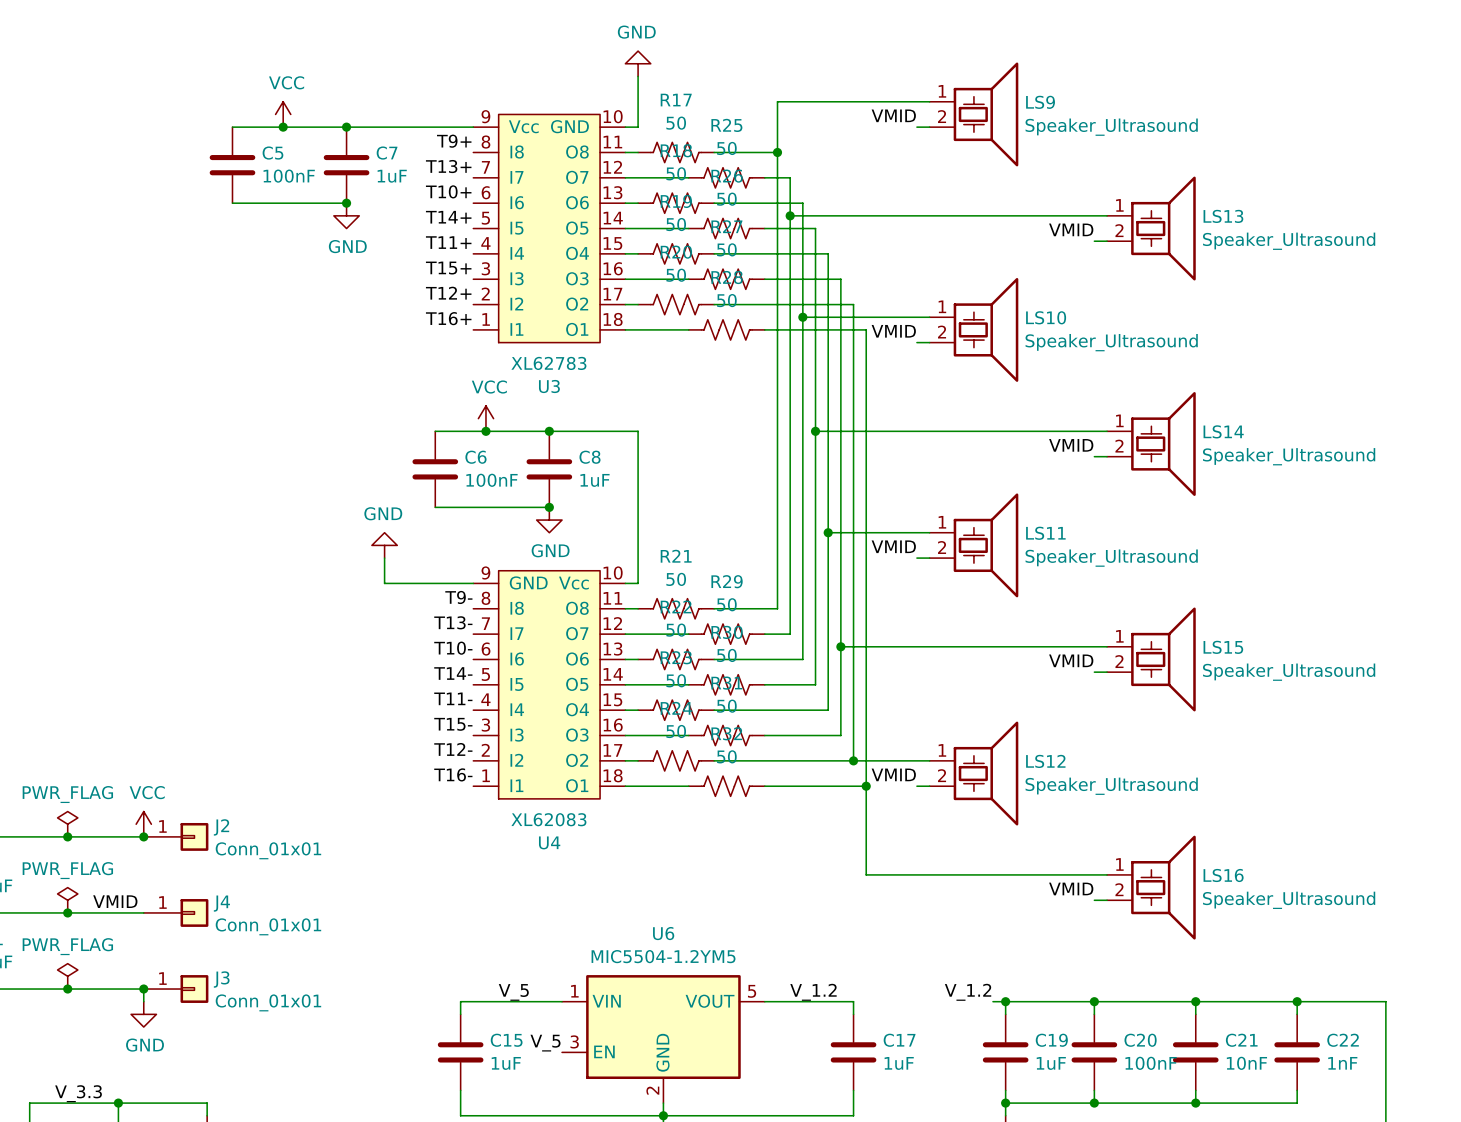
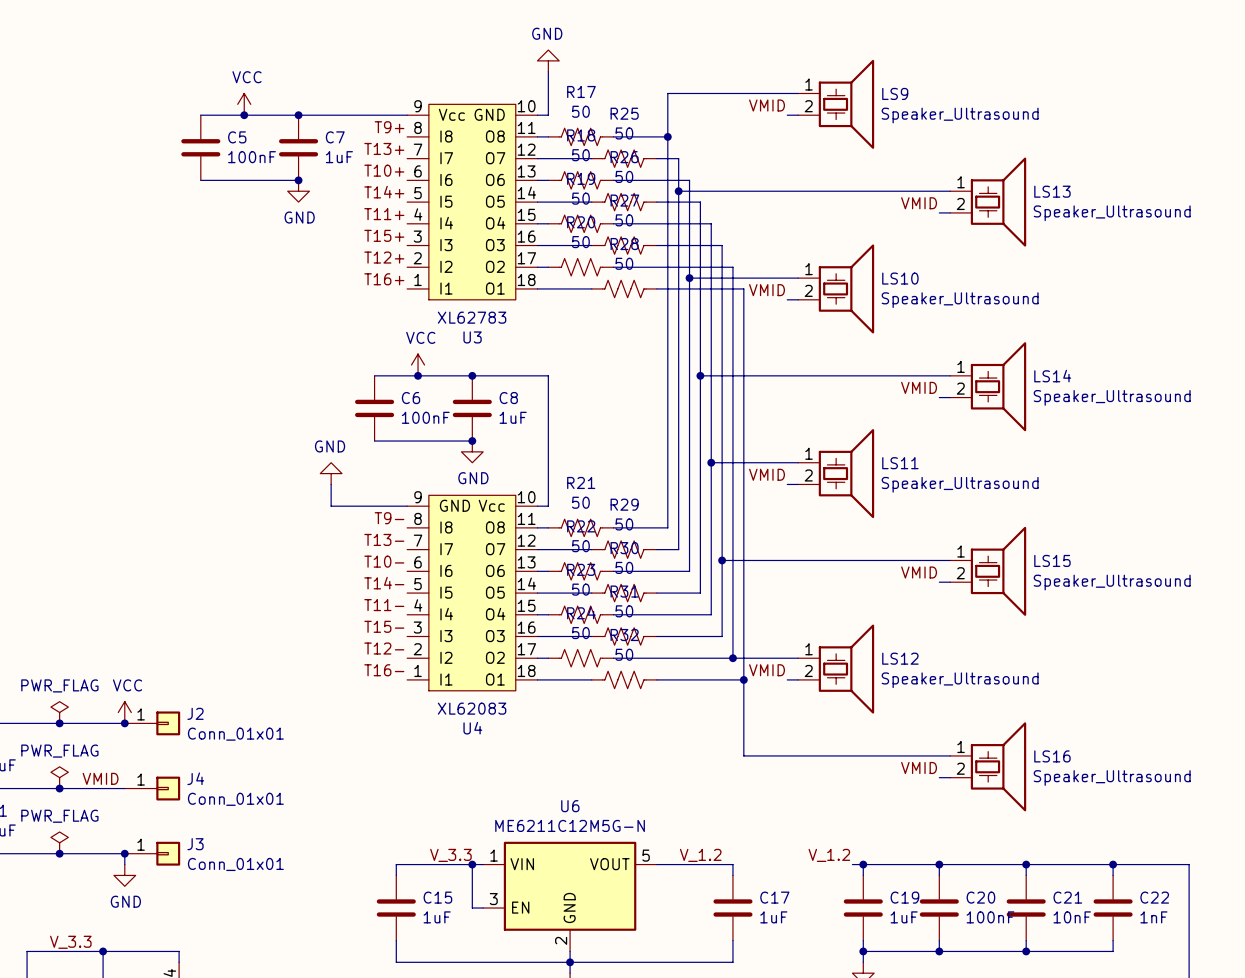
U6 value: MIC5504-1.2YM5 (663, 956) -> ME6211C12M5G-N (570, 825)
label: V_5 (513, 992) -> V_3.3 (450, 855)
wire: none -> (472, 864) (472, 908) (483, 908)
junction: none -> (472, 864)
label: V_5 (545, 1043) -> none

